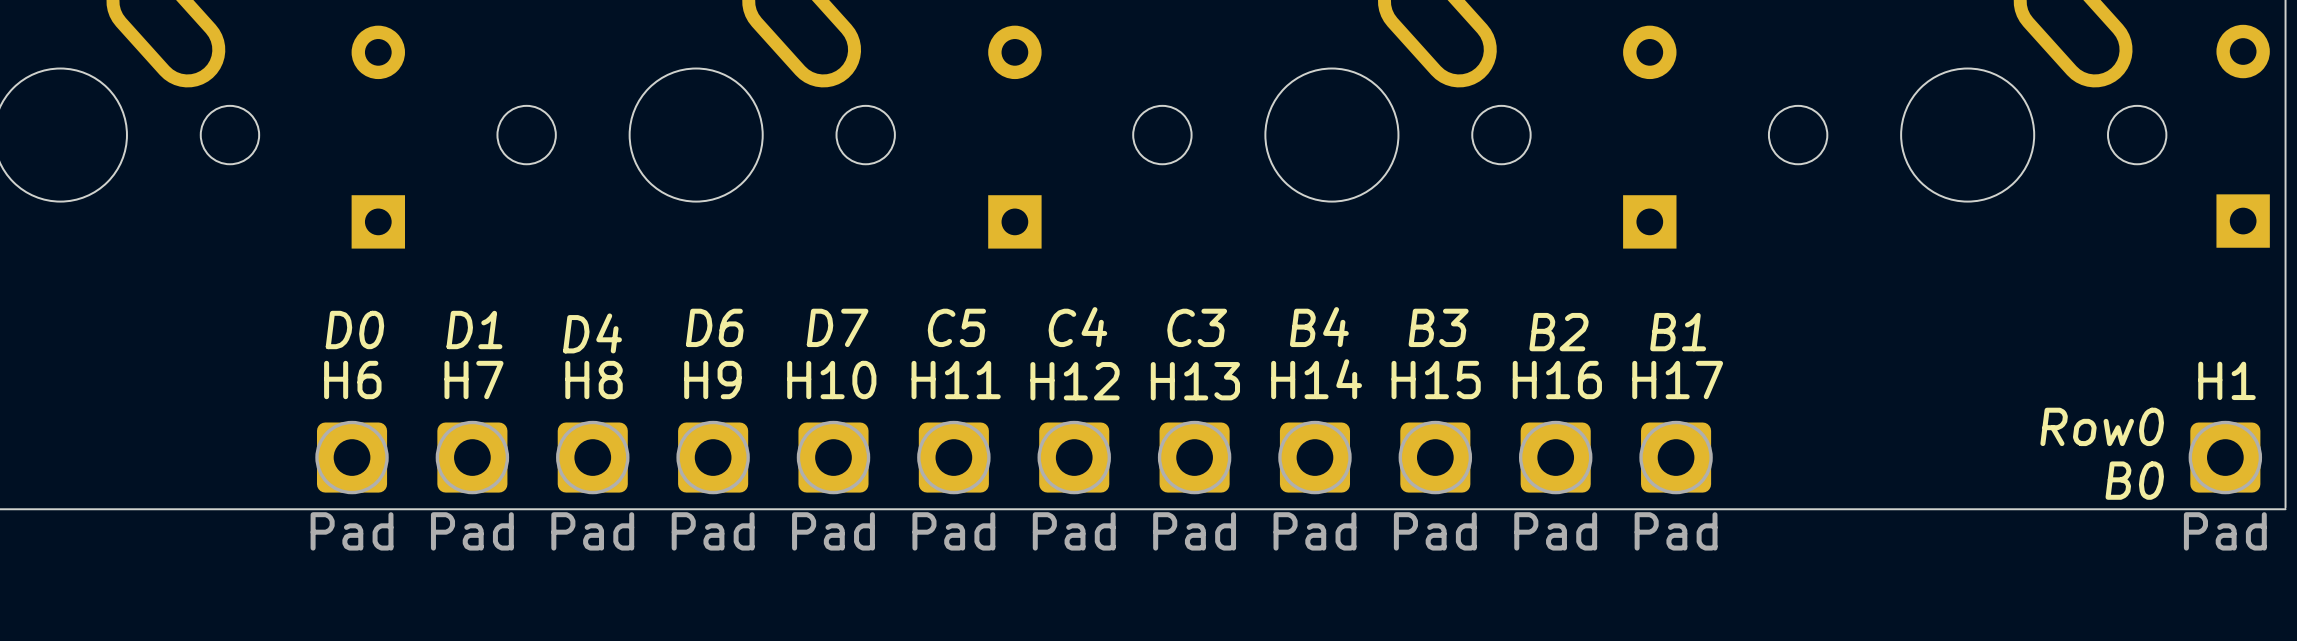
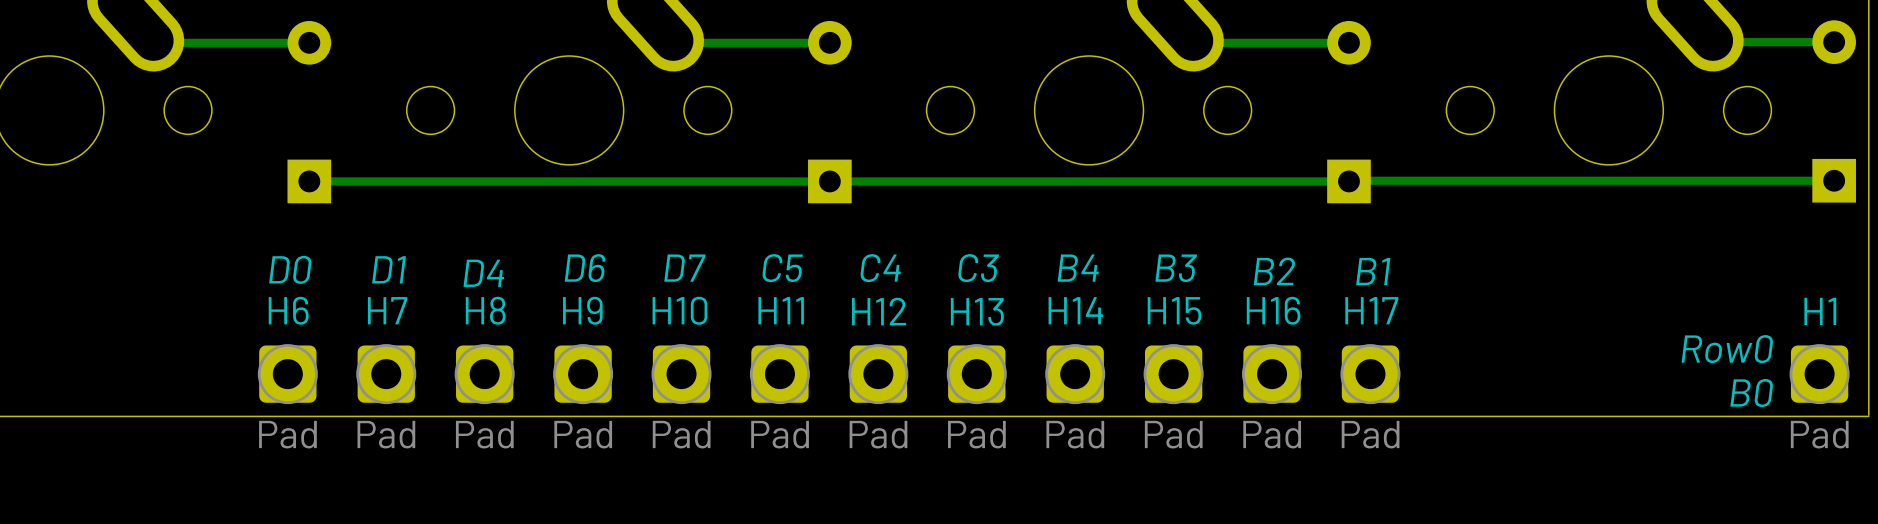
track: none -> (1834, 42) (1713, 42) (1710, 45)
track: none -> (309, 42) (153, 42) (151, 45)
track: none -> (829, 42) (673, 42) (671, 45)
track: none -> (1348, 42) (1193, 42) (1190, 45)
track: none -> (1834, 180) (309, 181)

